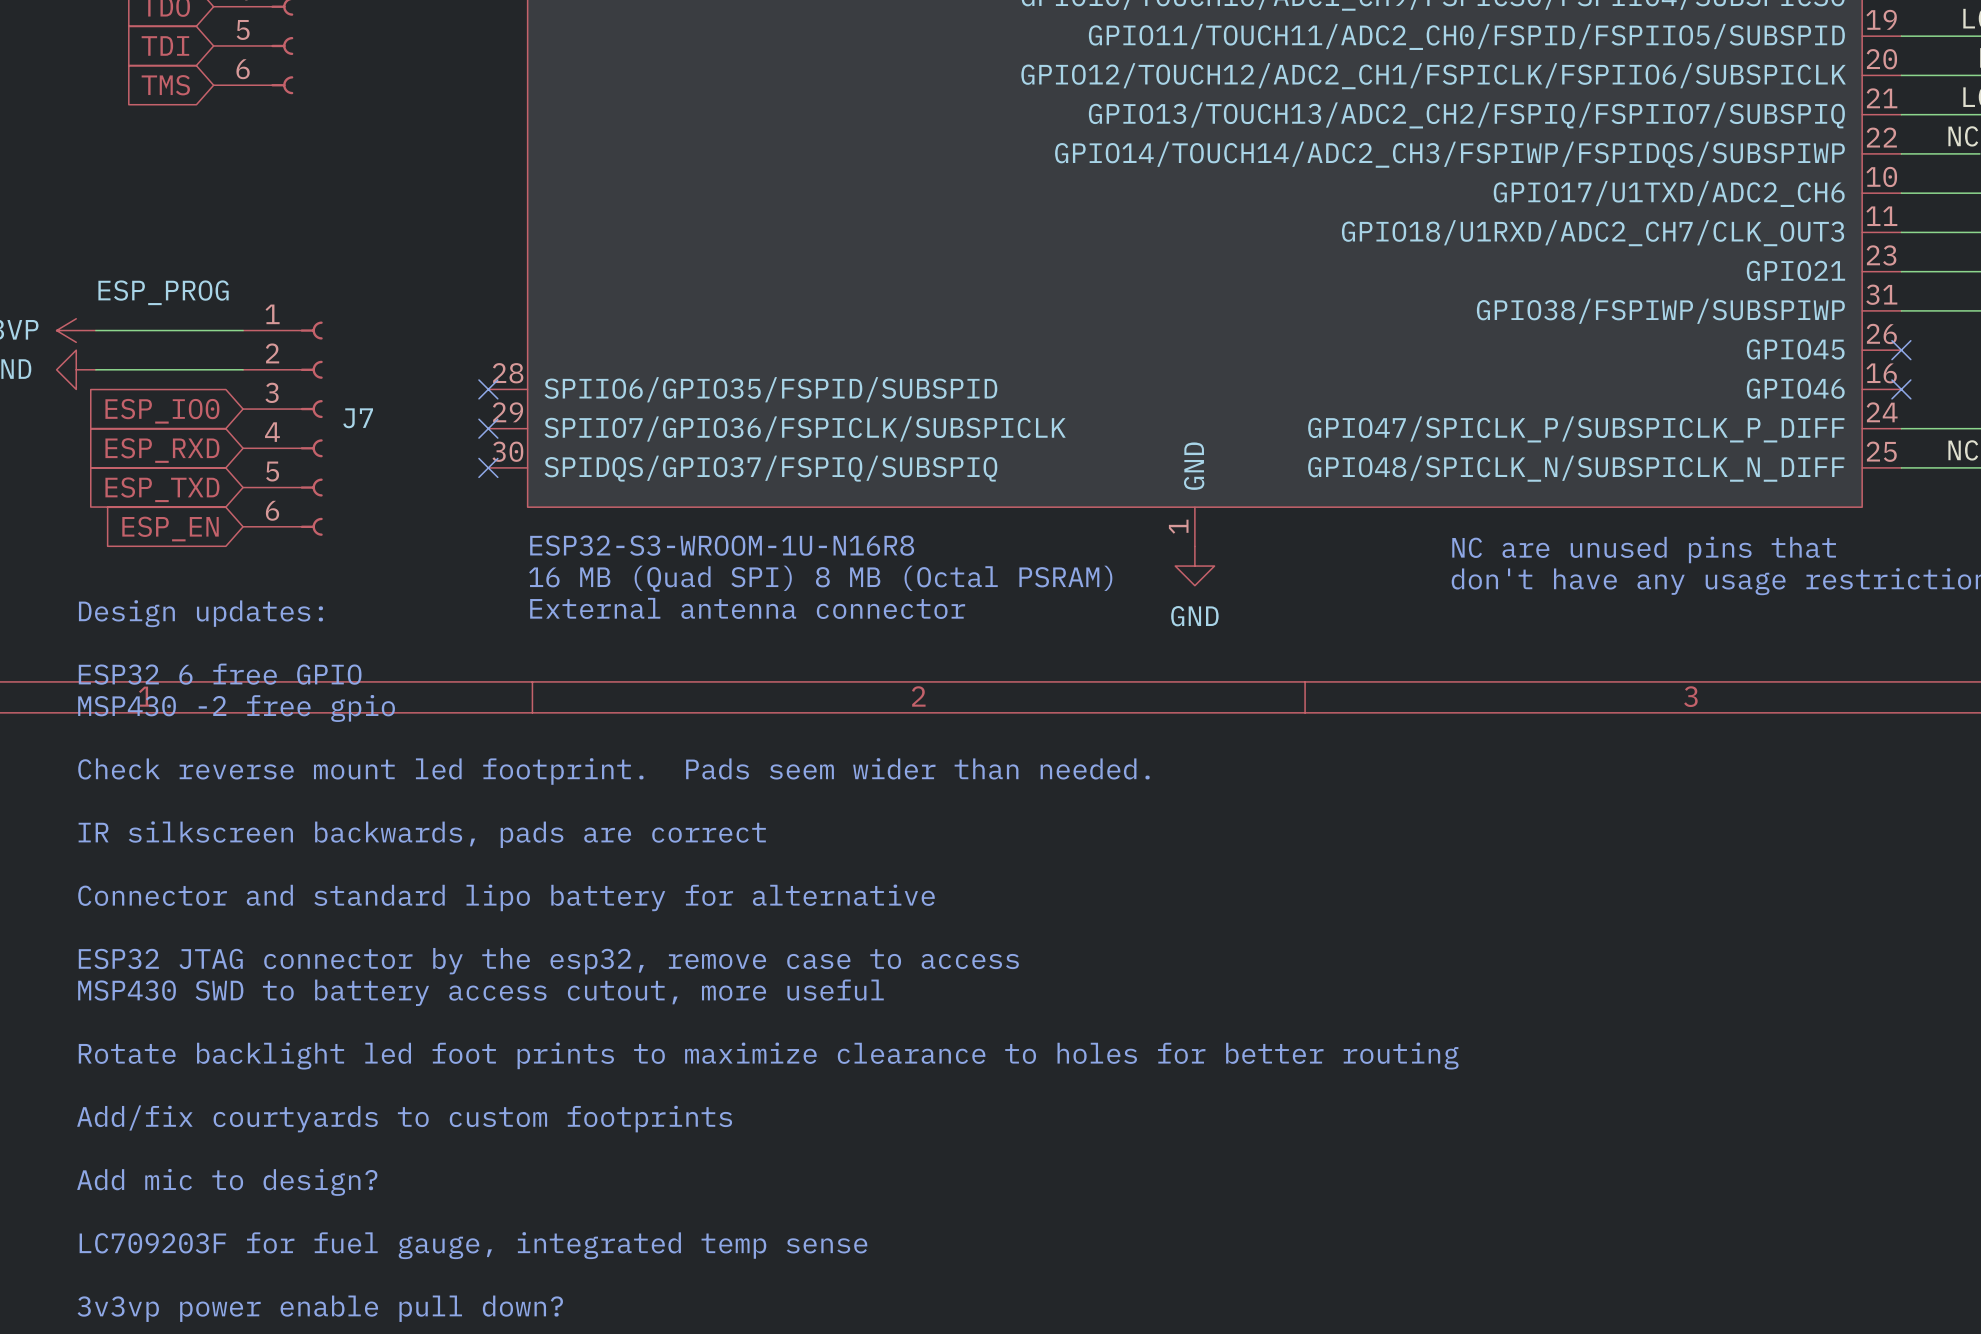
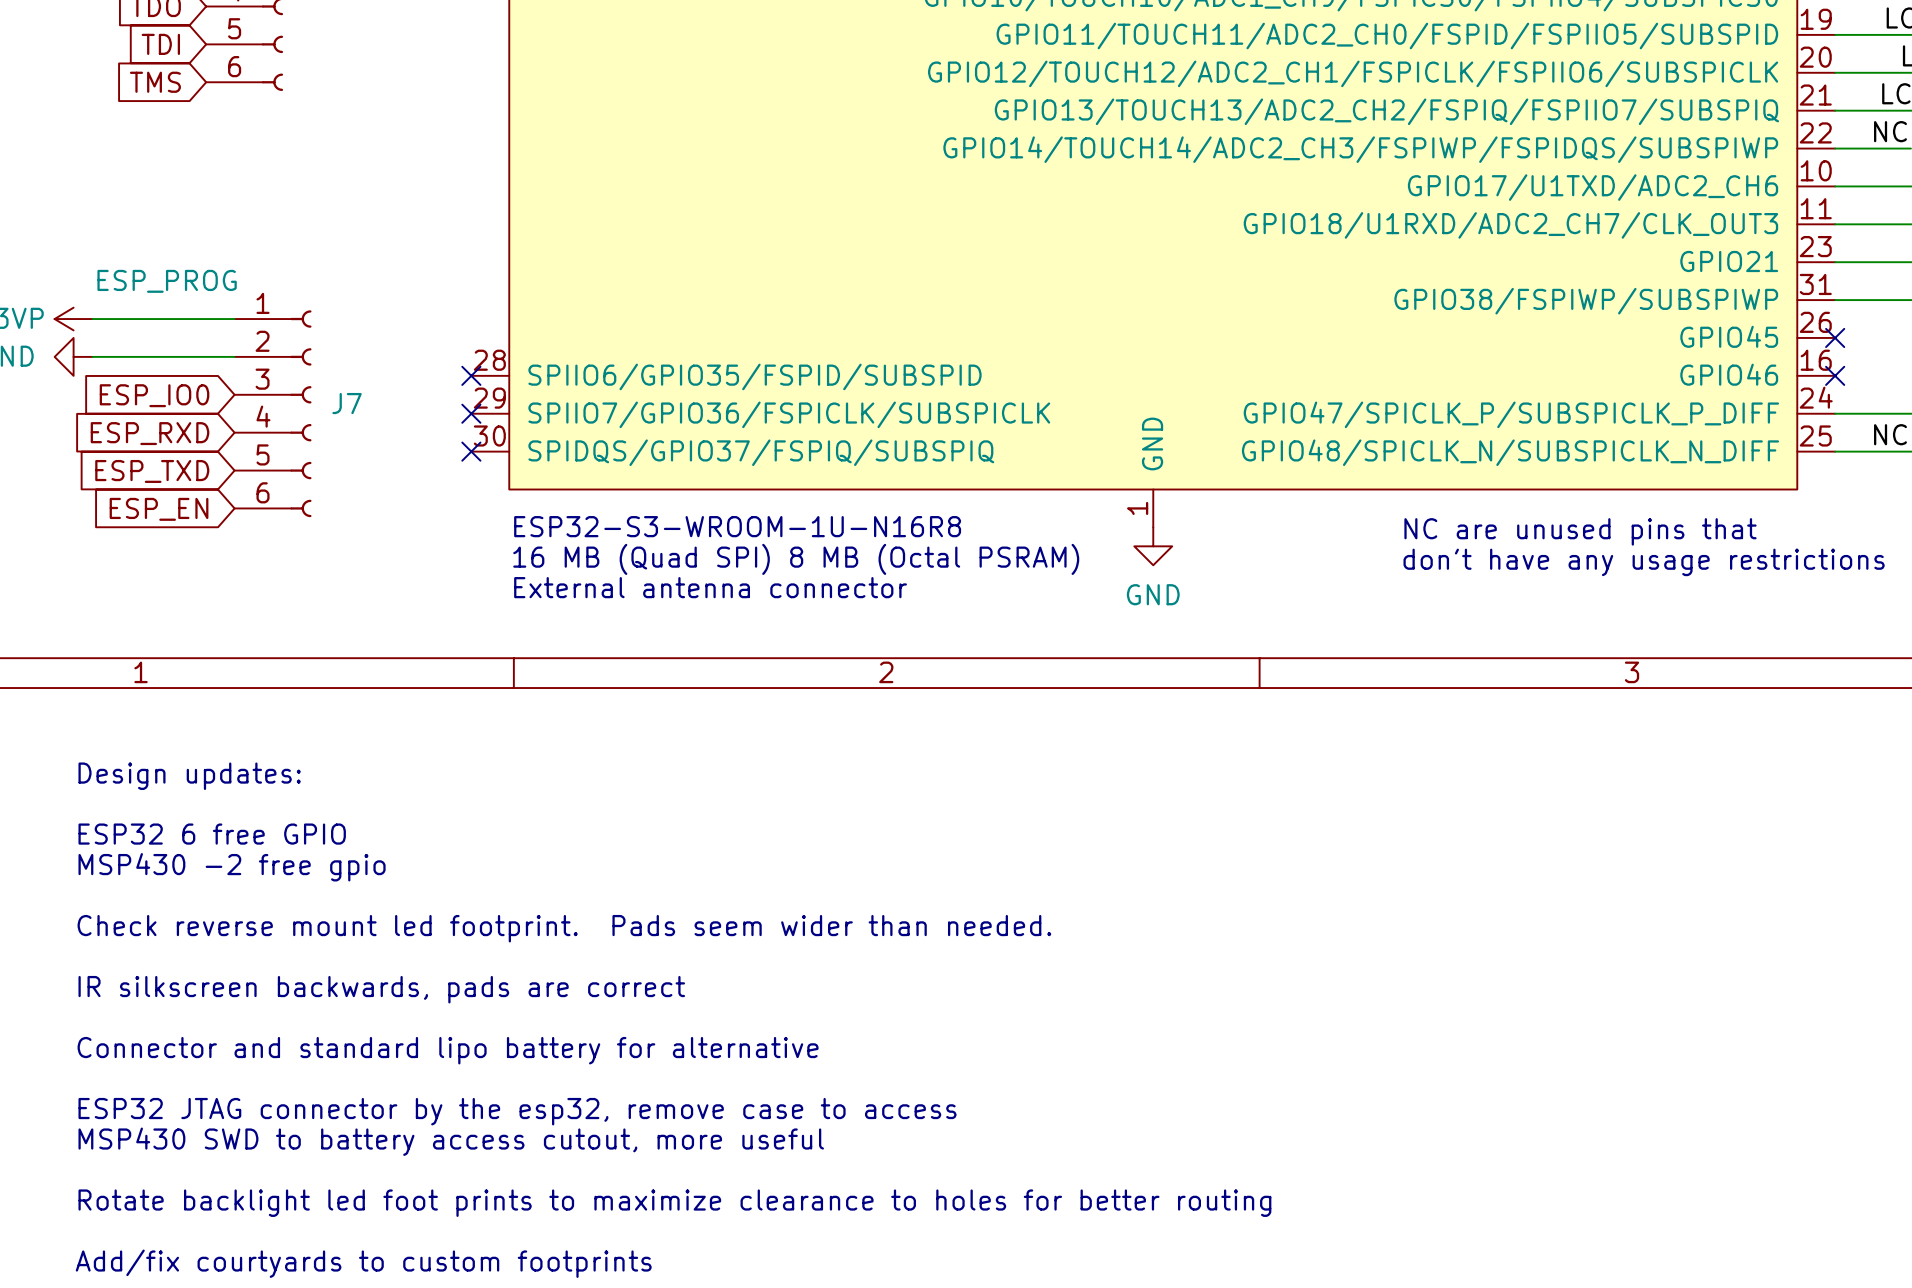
text position: Design updates: (200, 613) -> Design updates: (189, 776)
text position: ESP32 6 free GPIO (220, 674) -> ESP32 6 free GPIO (212, 834)
text: MSP430 -2 free gpio (236, 708) -> none
text: Check reverse mount led footprint. Pads seem wider than needed. (613, 771) -> none
text position: IR silkscreen backwards, pads are correct (422, 834) -> IR silkscreen backwards, pads are correct (381, 989)
text: Connector and standard lipo battery for alternative (506, 897) -> MSP430 -2 free gpio (232, 867)
text: ESP32 JTAG connector by the esp32, remove case to access (548, 961) -> Check reverse mount led footprint. Pads seem wider than needed. (564, 928)
text: MSP430 SWD to battery access cutout, more useful (480, 992) -> none
text: Rotate backlight led foot prints to maximize clearance to holes for better routing (768, 1056) -> none
text: none -> Connector and standard lipo battery for alternative (448, 1050)
text: Add/fix courtyards to custom footprints (404, 1118) -> none
text: none -> ESP32 JTAG connector by the esp32, remove case to access (517, 1111)
text: Add mic to design? (227, 1182) -> MSP430 SWD to battery access cutout, more useful (451, 1141)
text: LC709203F for fuel gauge, integrated temp sense (473, 1245) -> Rotate backlight led foot prints to maximize clearance to holes for better routing (674, 1203)
text: 3v3vp power enable pull down? (320, 1308) -> Add/fix courtyards to custom footprints (363, 1263)

